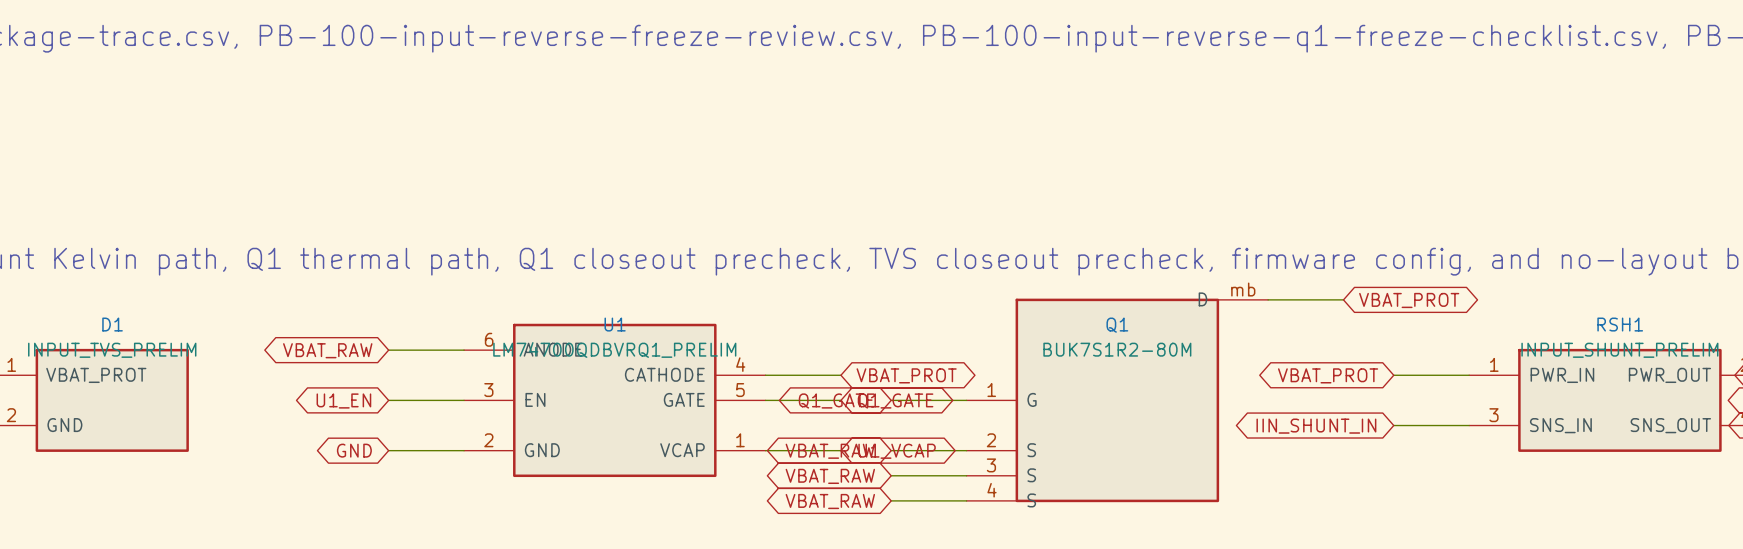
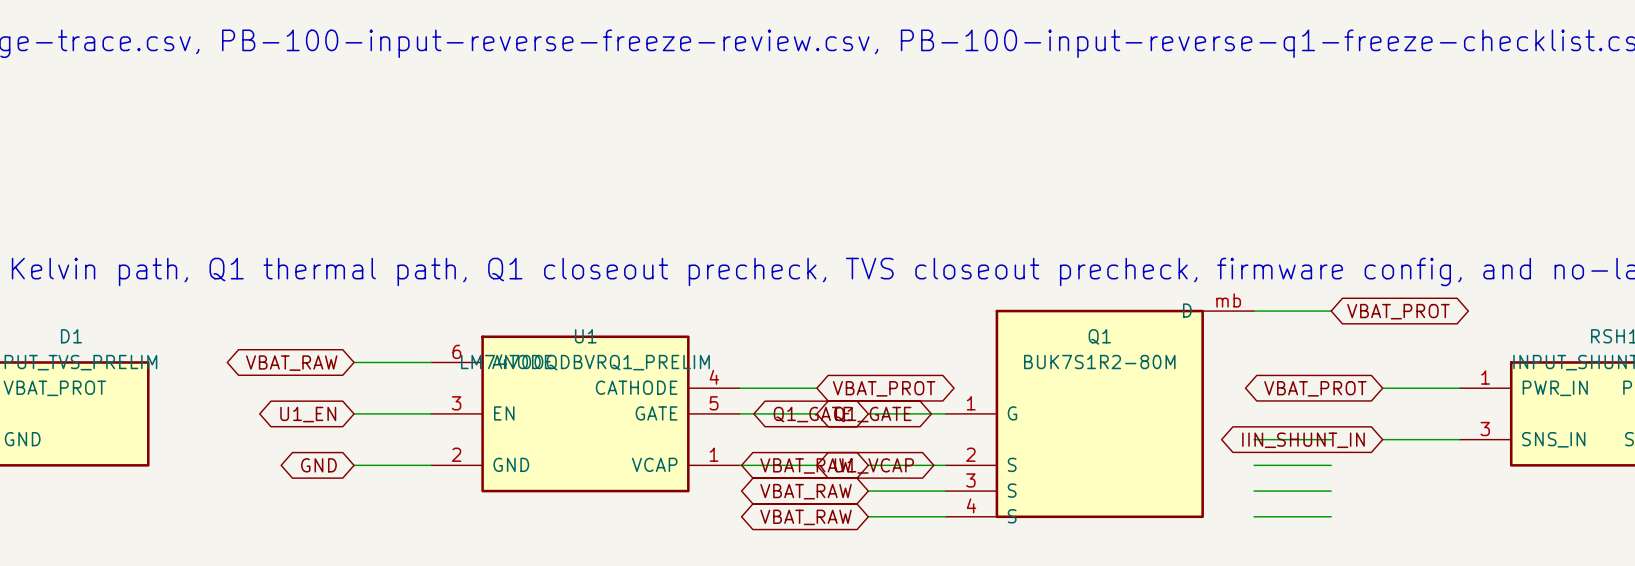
wire: none -> (1254, 439) (1331, 439)
wire: none -> (1254, 465) (1331, 465)
wire: none -> (1254, 491) (1331, 491)
wire: none -> (1254, 516) (1331, 516)

